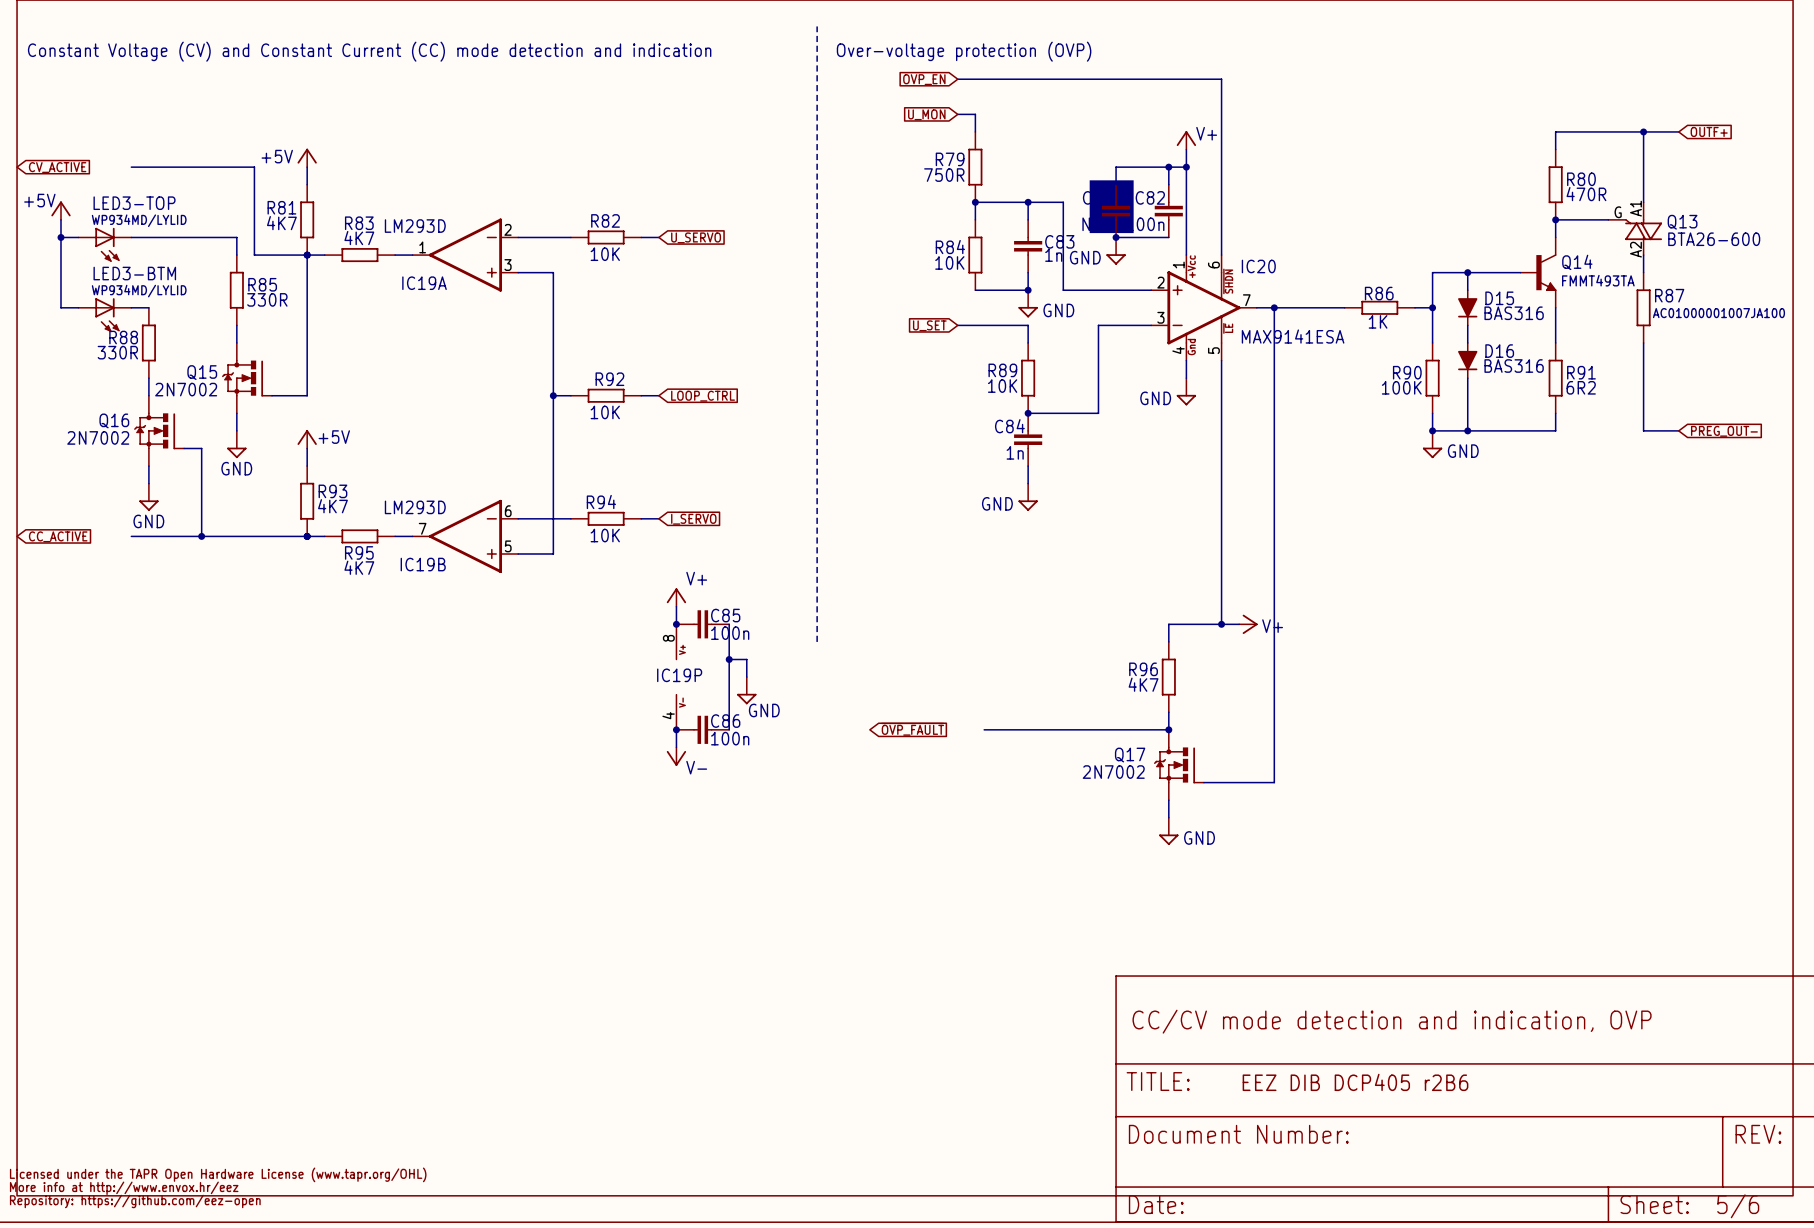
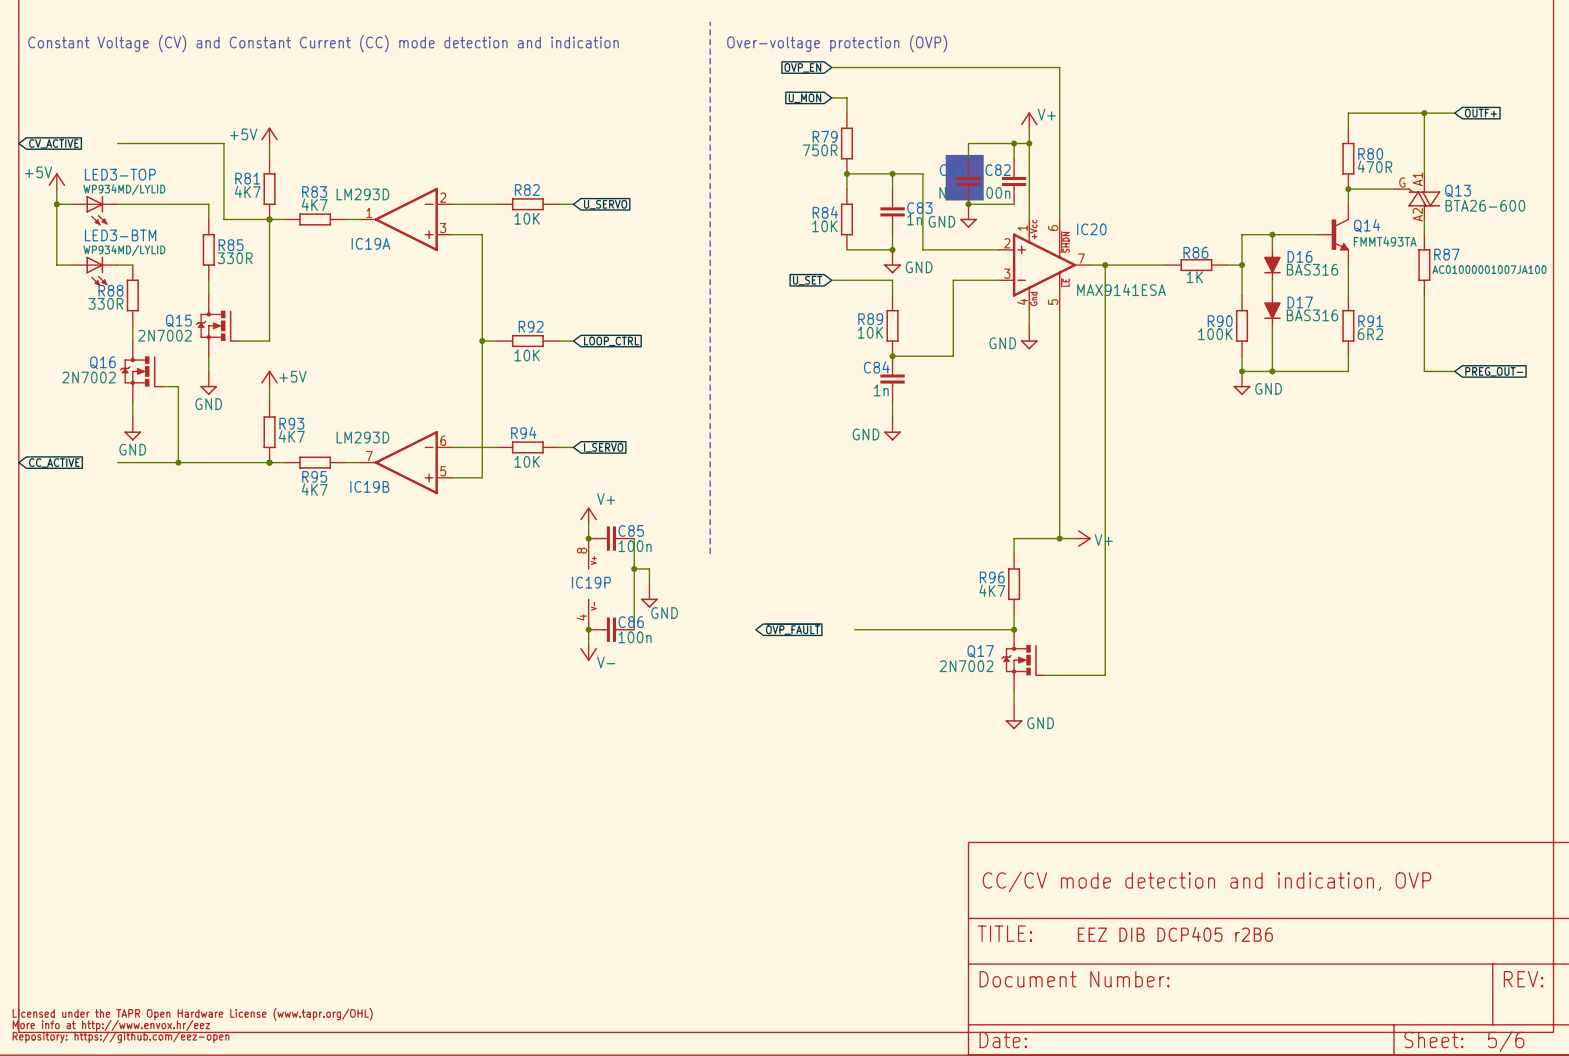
D15 name: D15 (1499, 298) -> D16 (1300, 256)
D16 name: D16 (1499, 351) -> D17 (1300, 302)

